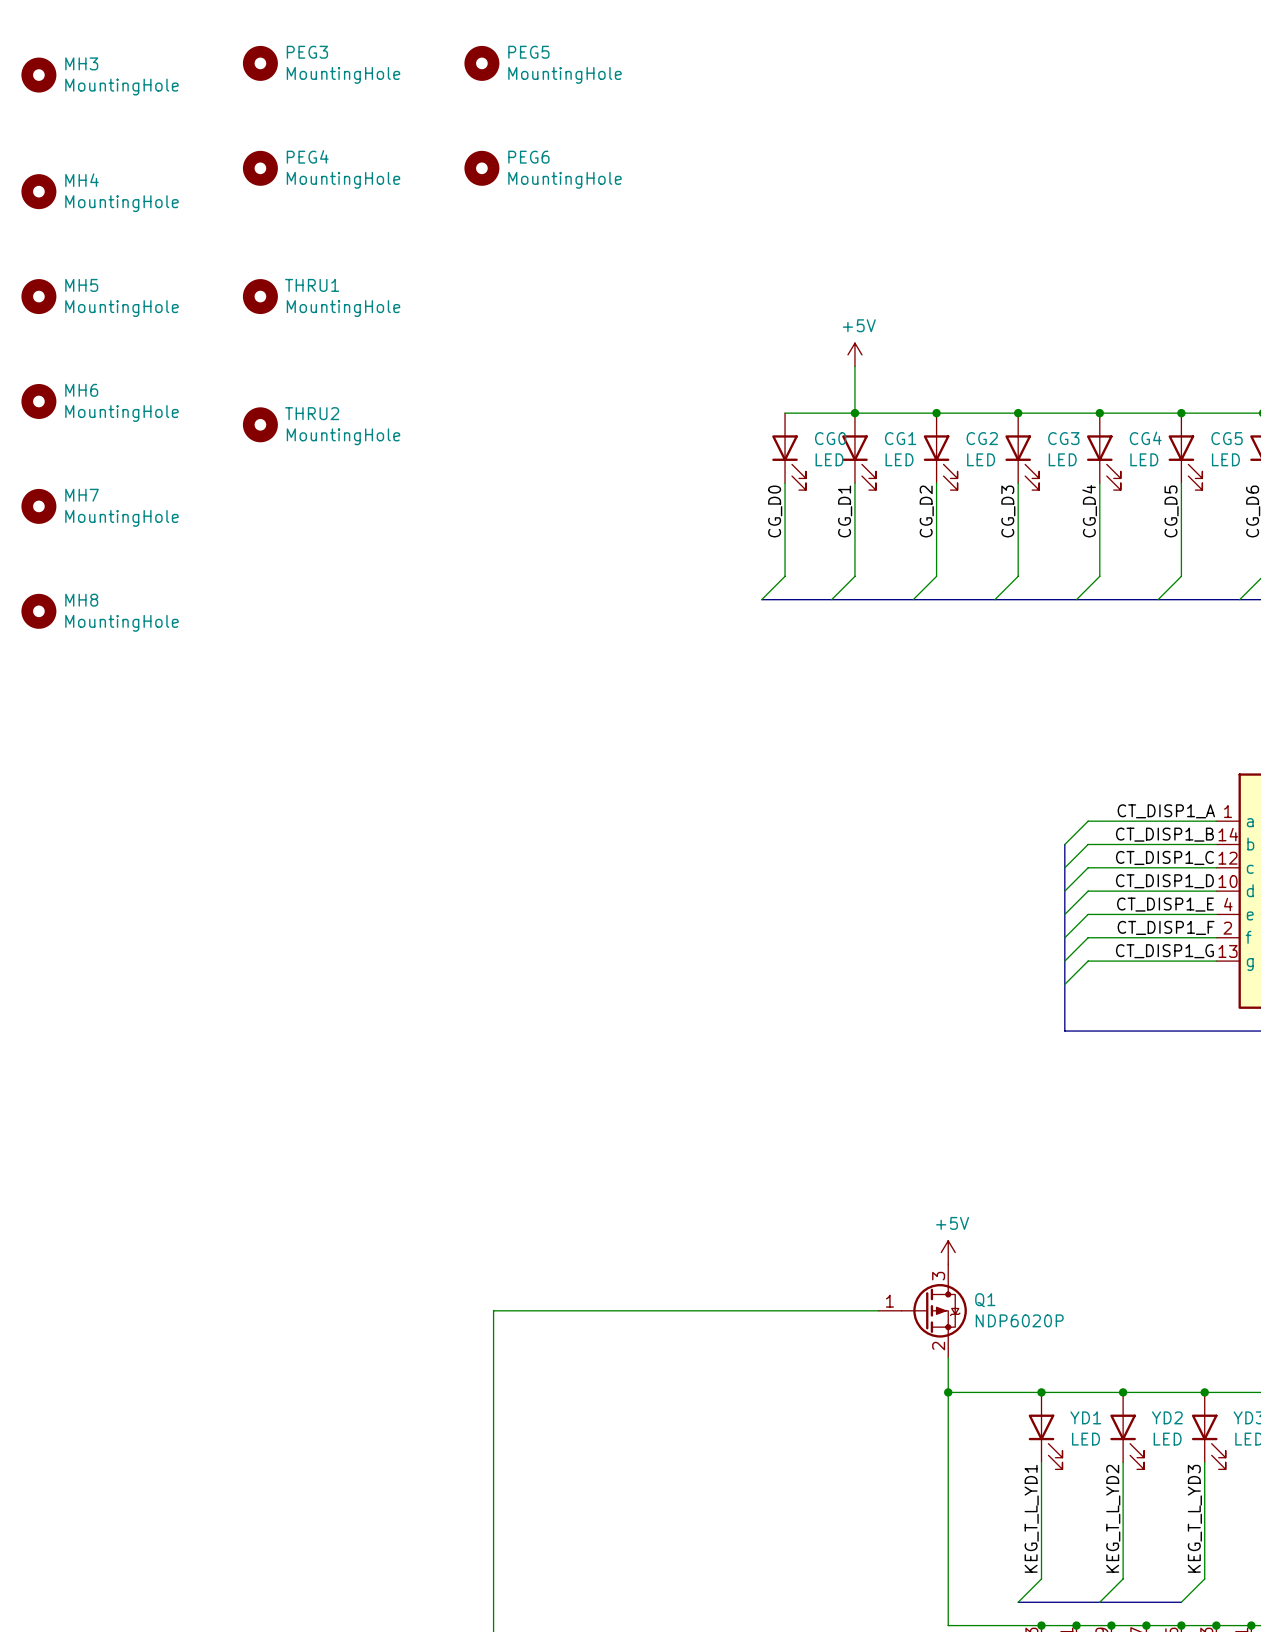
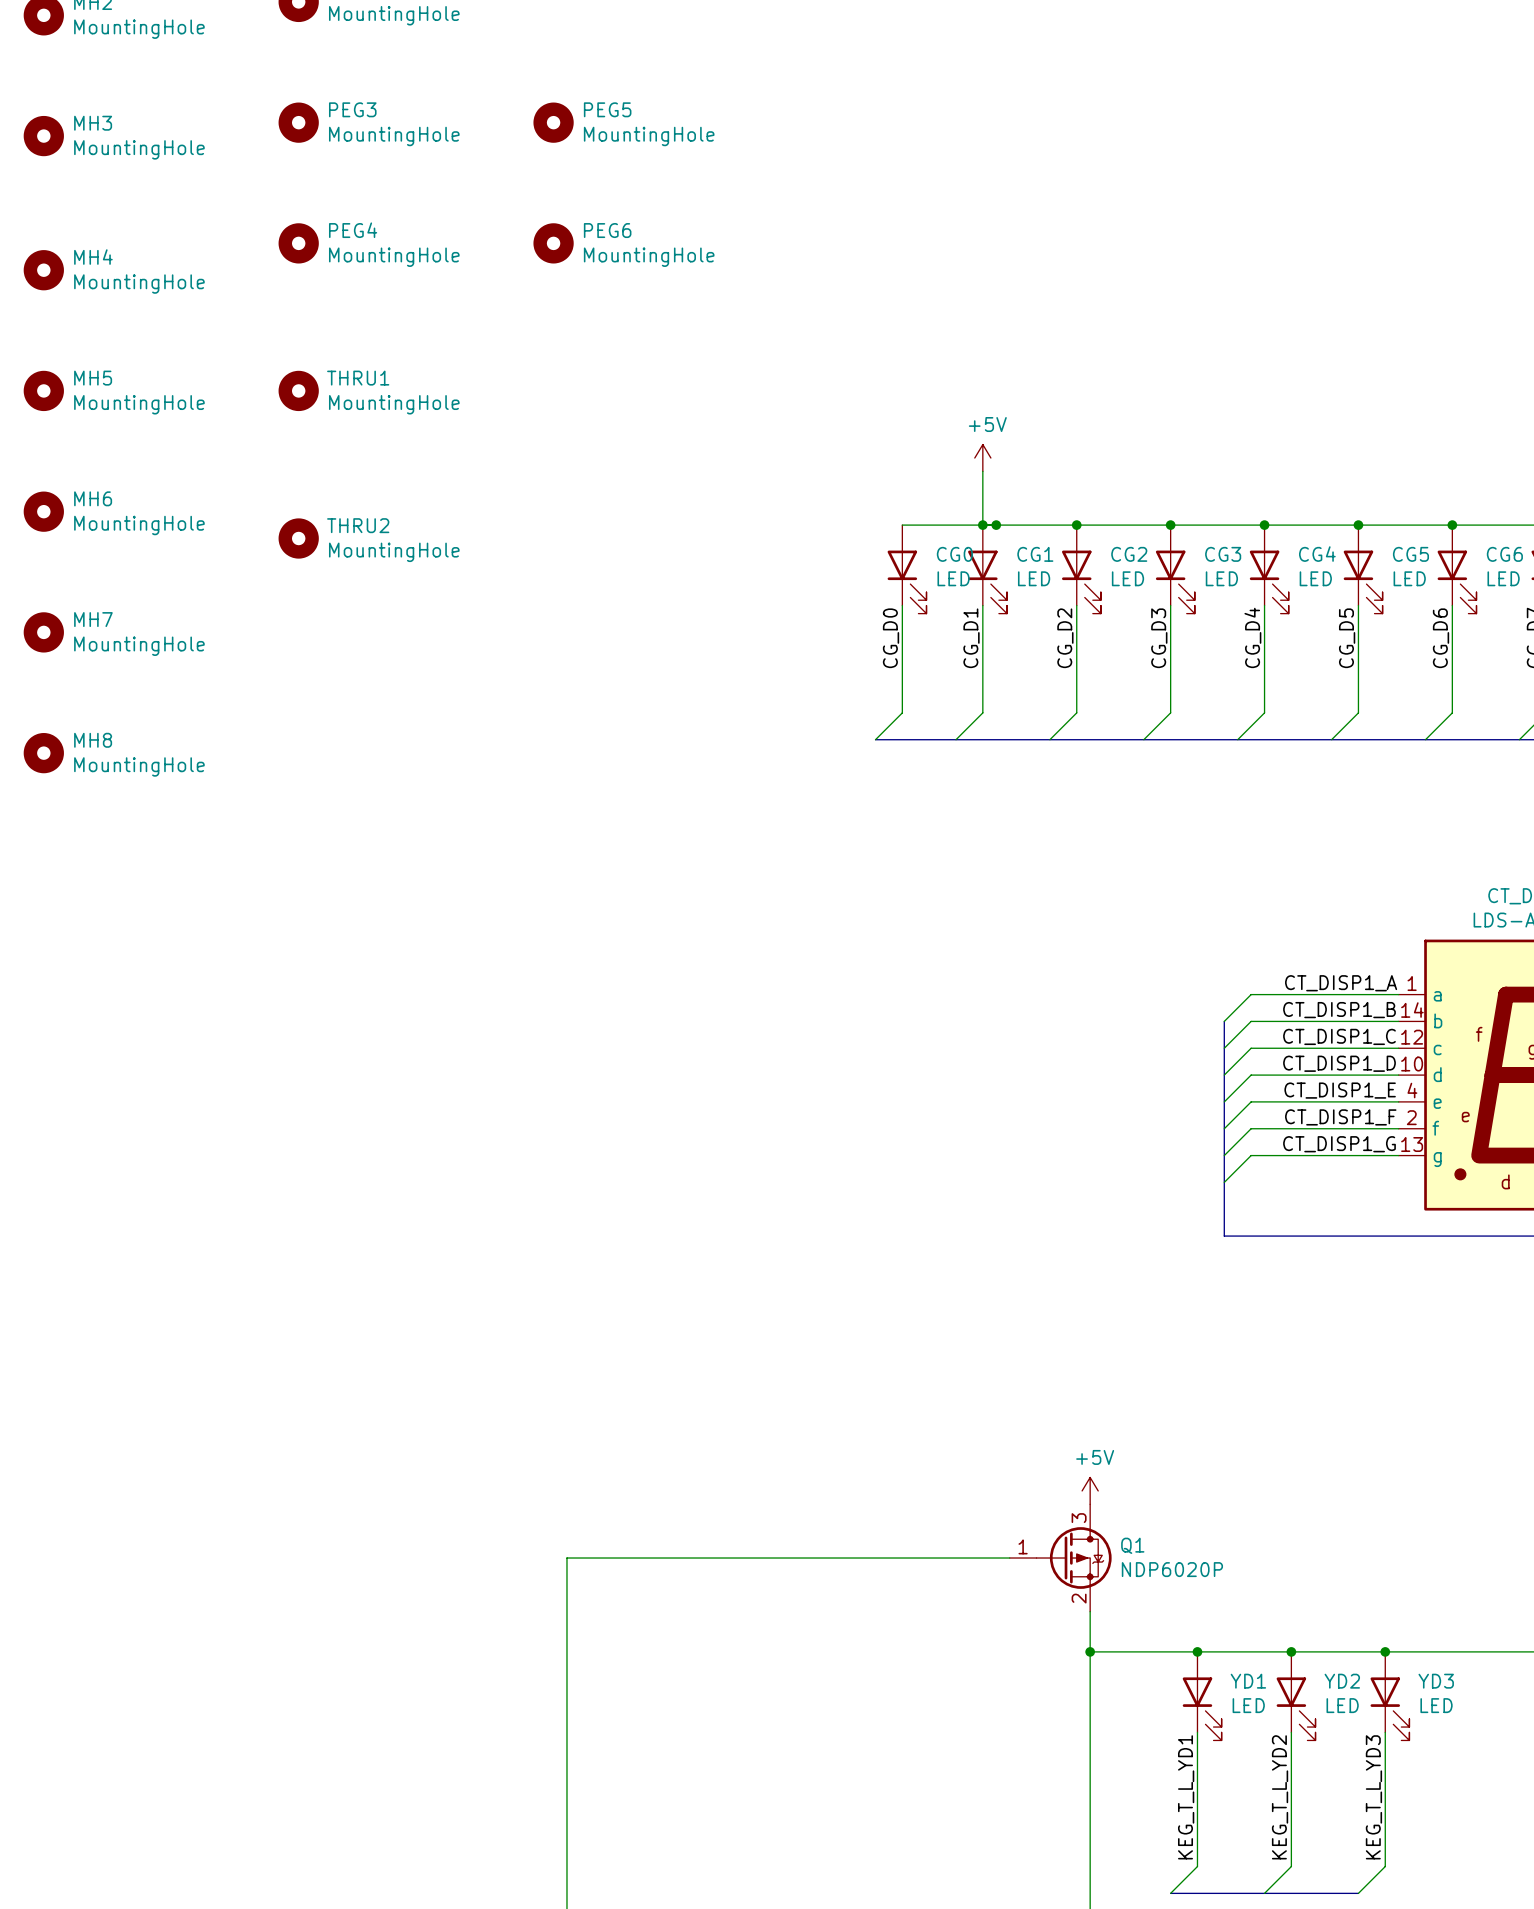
junction: none -> (996, 525)

